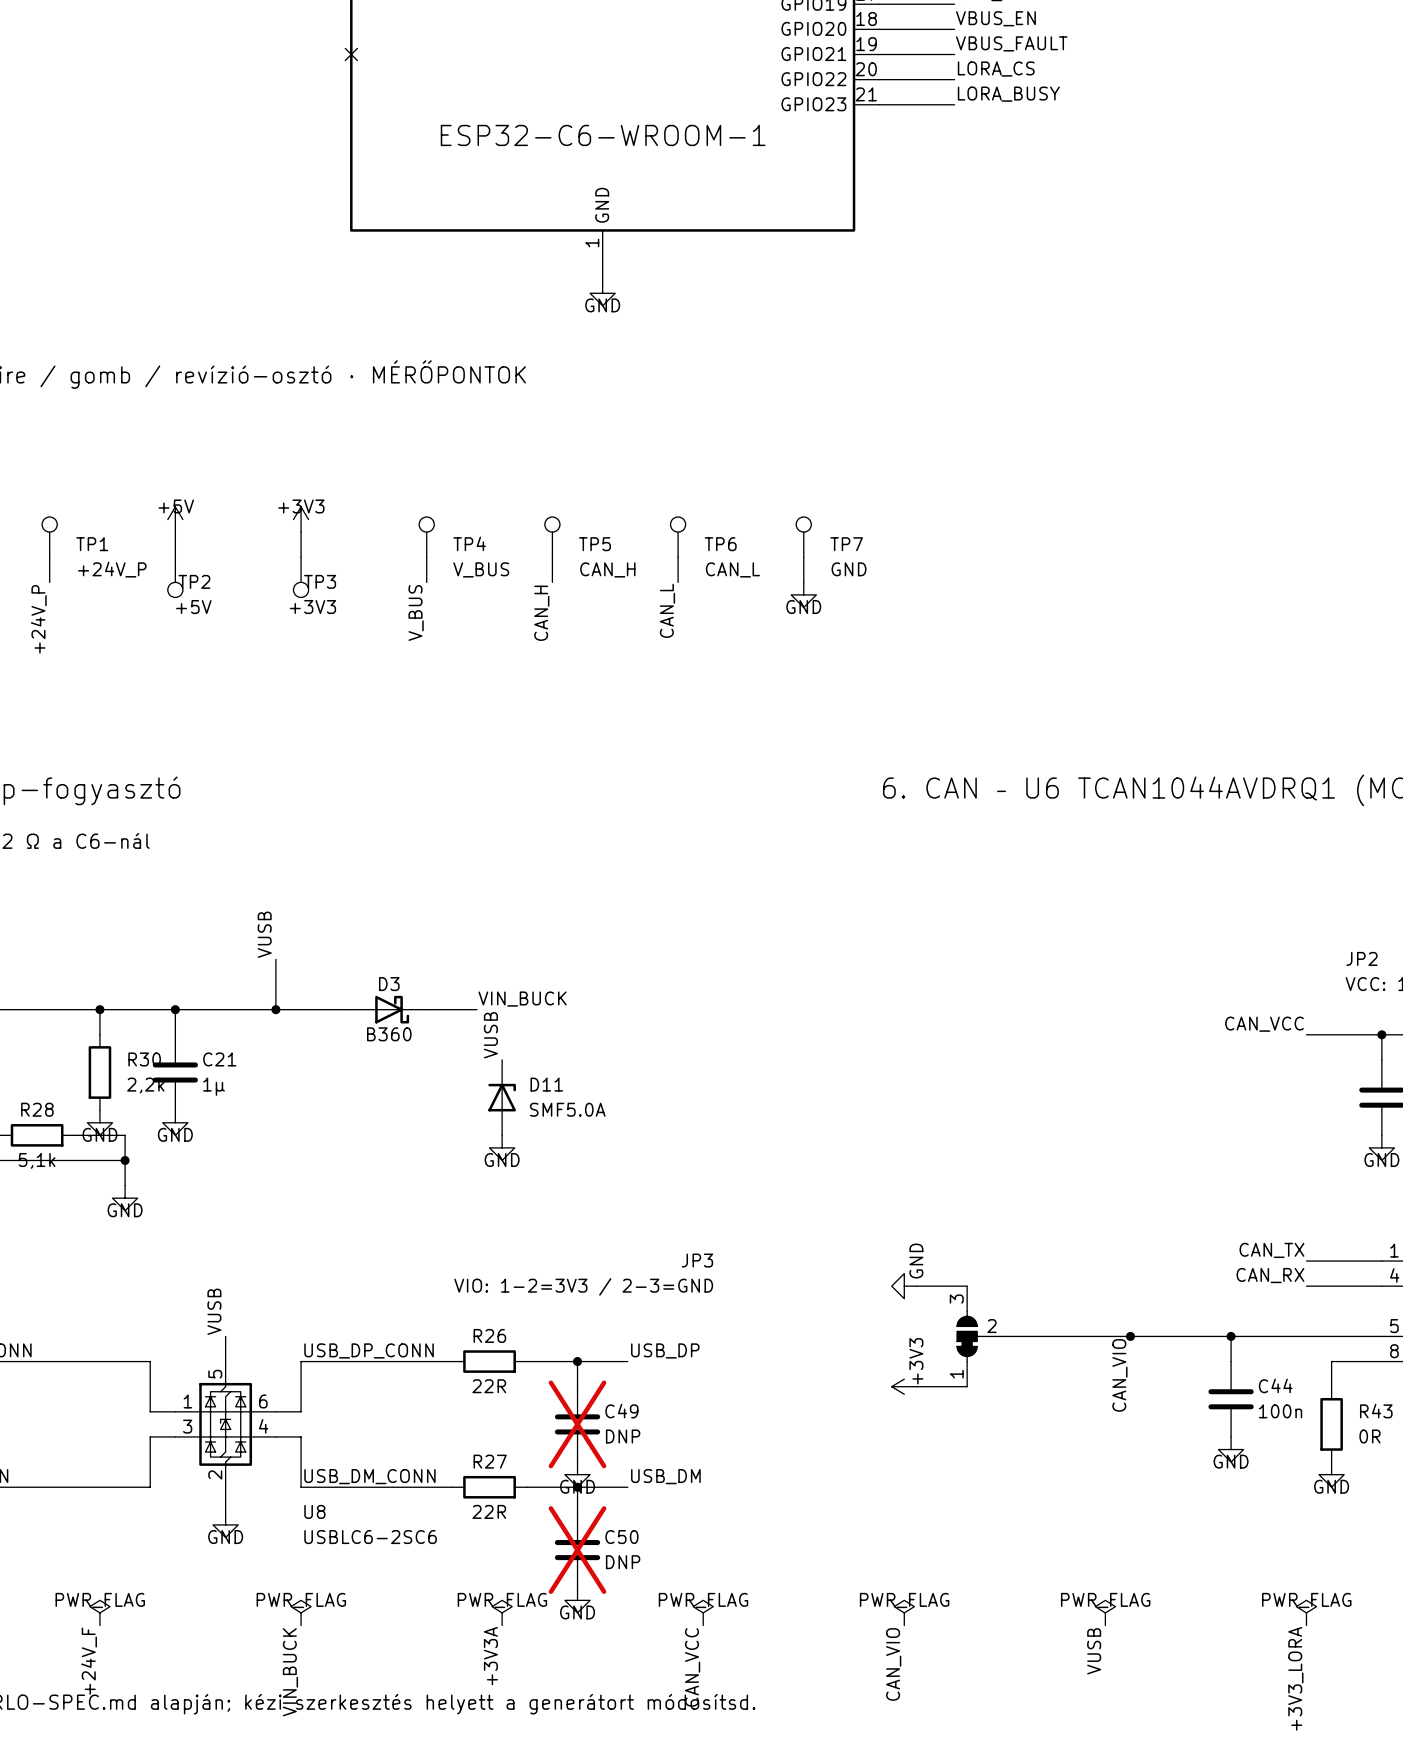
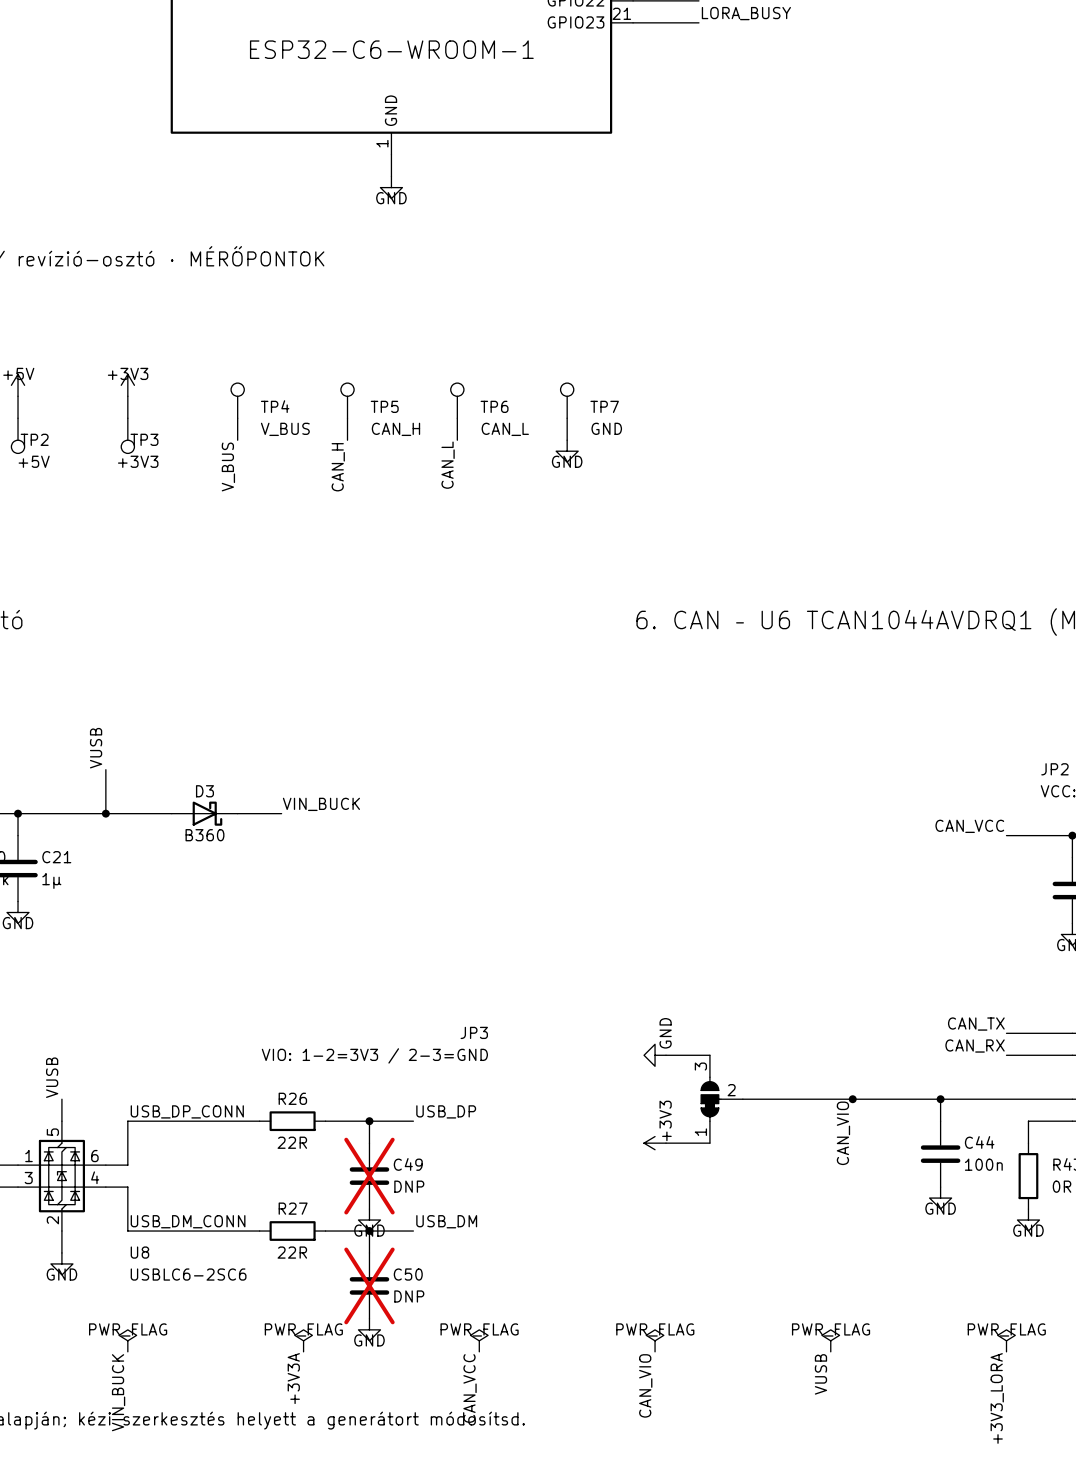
label: VUSB (490, 1035) -> none
D11: SMF5.0A (502, 1097) -> none
power symbol: GND (502, 1147) -> none

